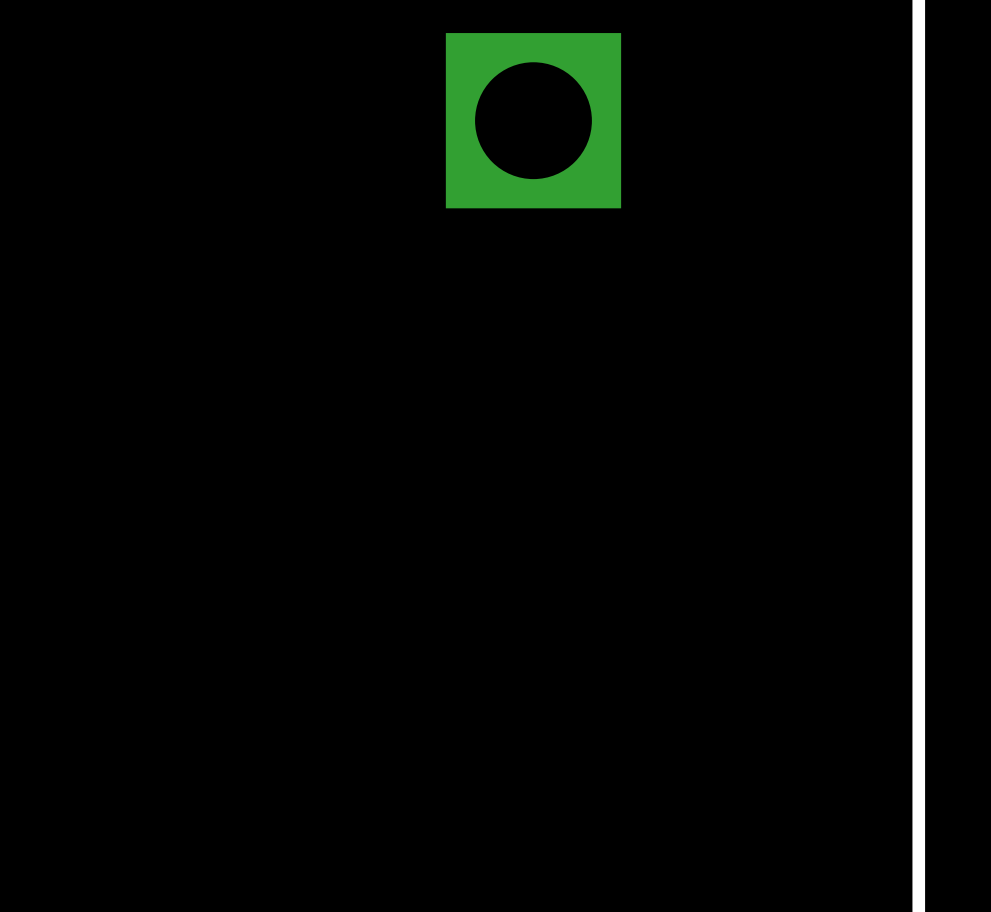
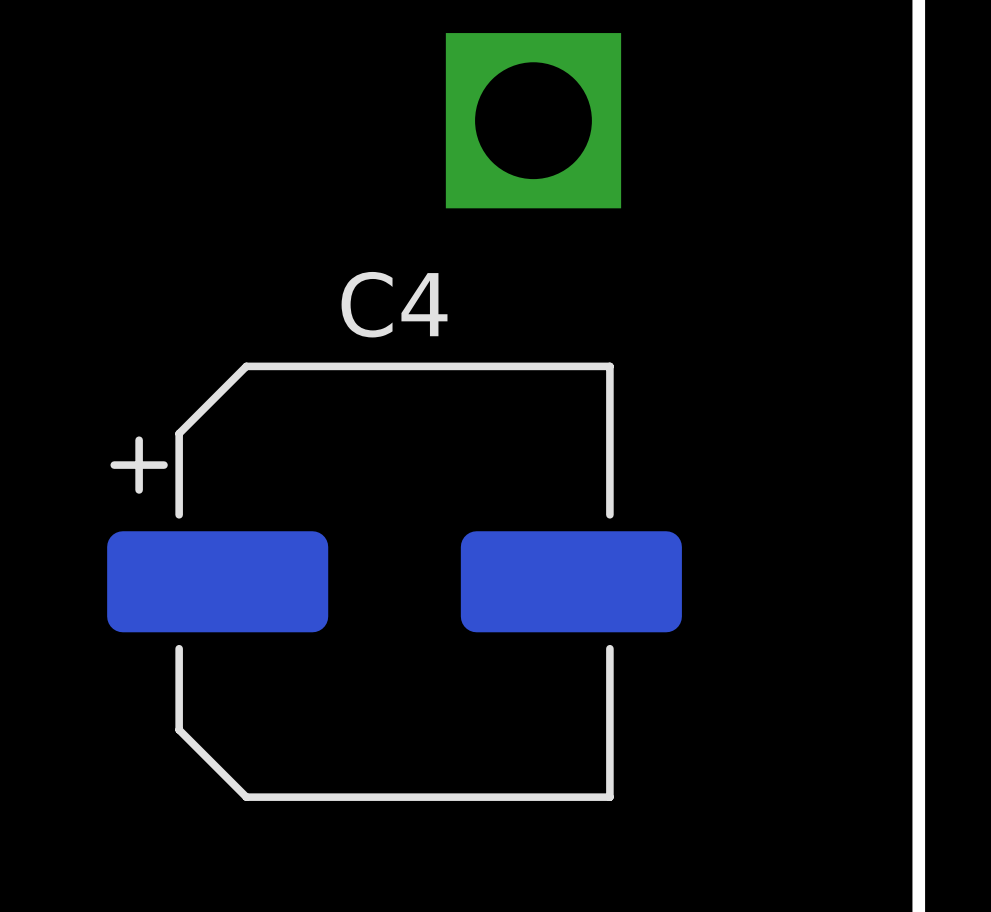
C4: none -> (394, 581)

